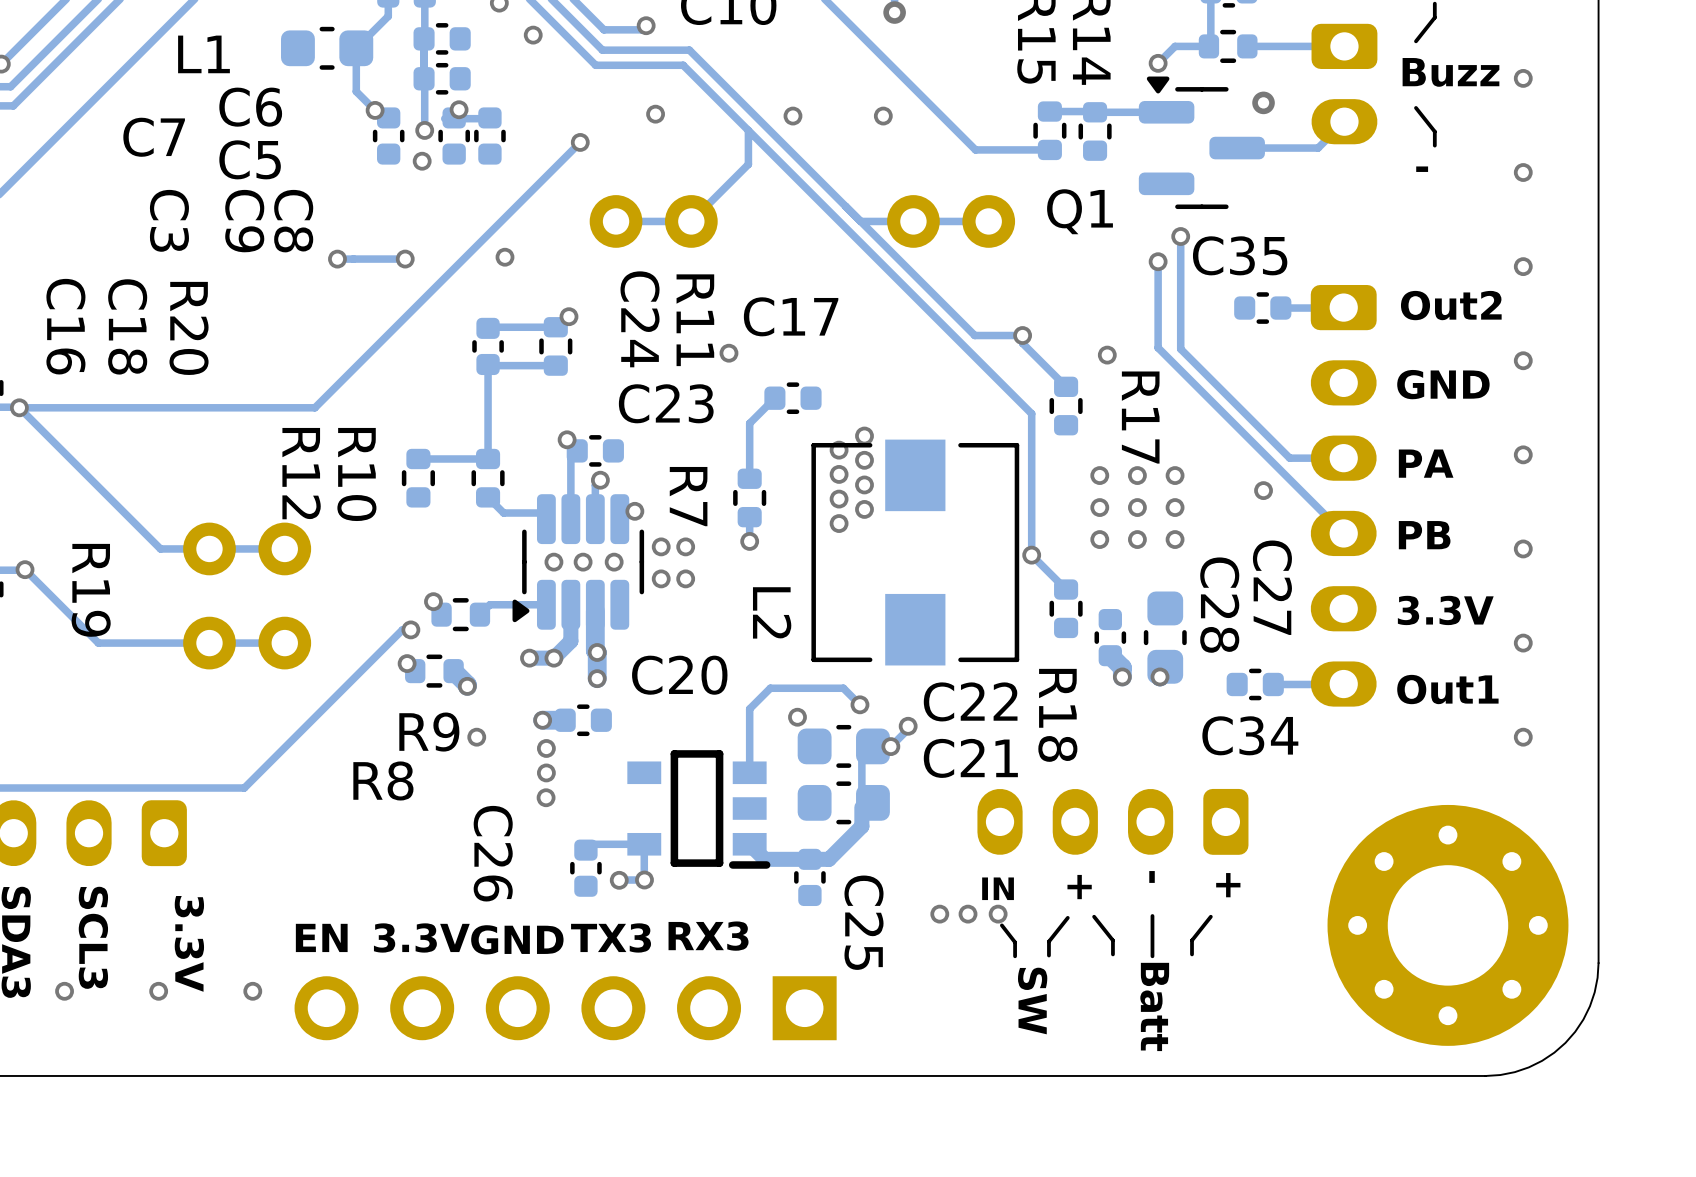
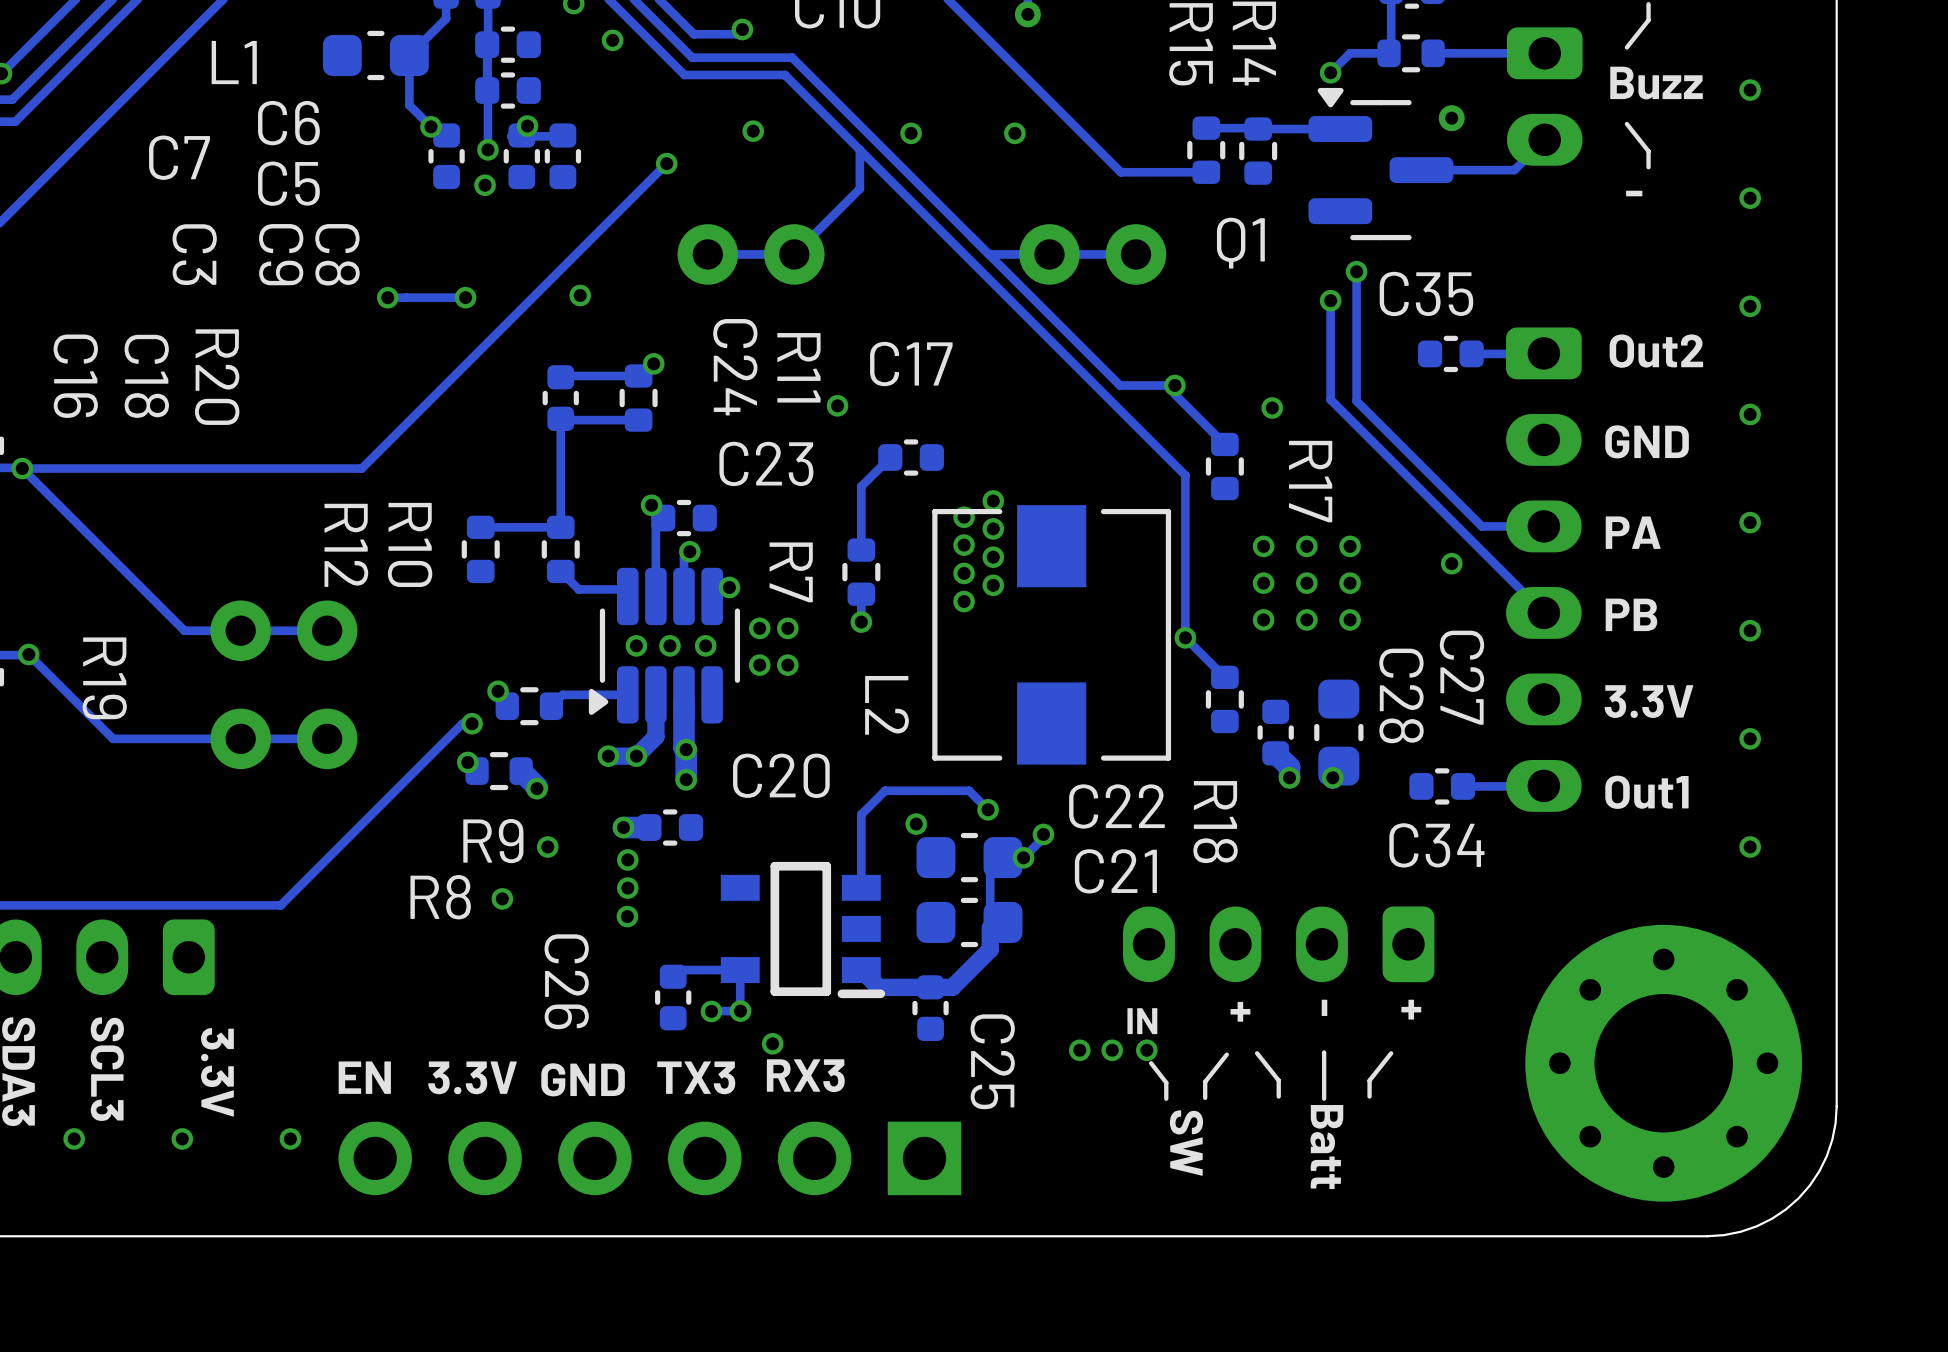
via: none -> (502, 898)
via: none -> (772, 1043)

